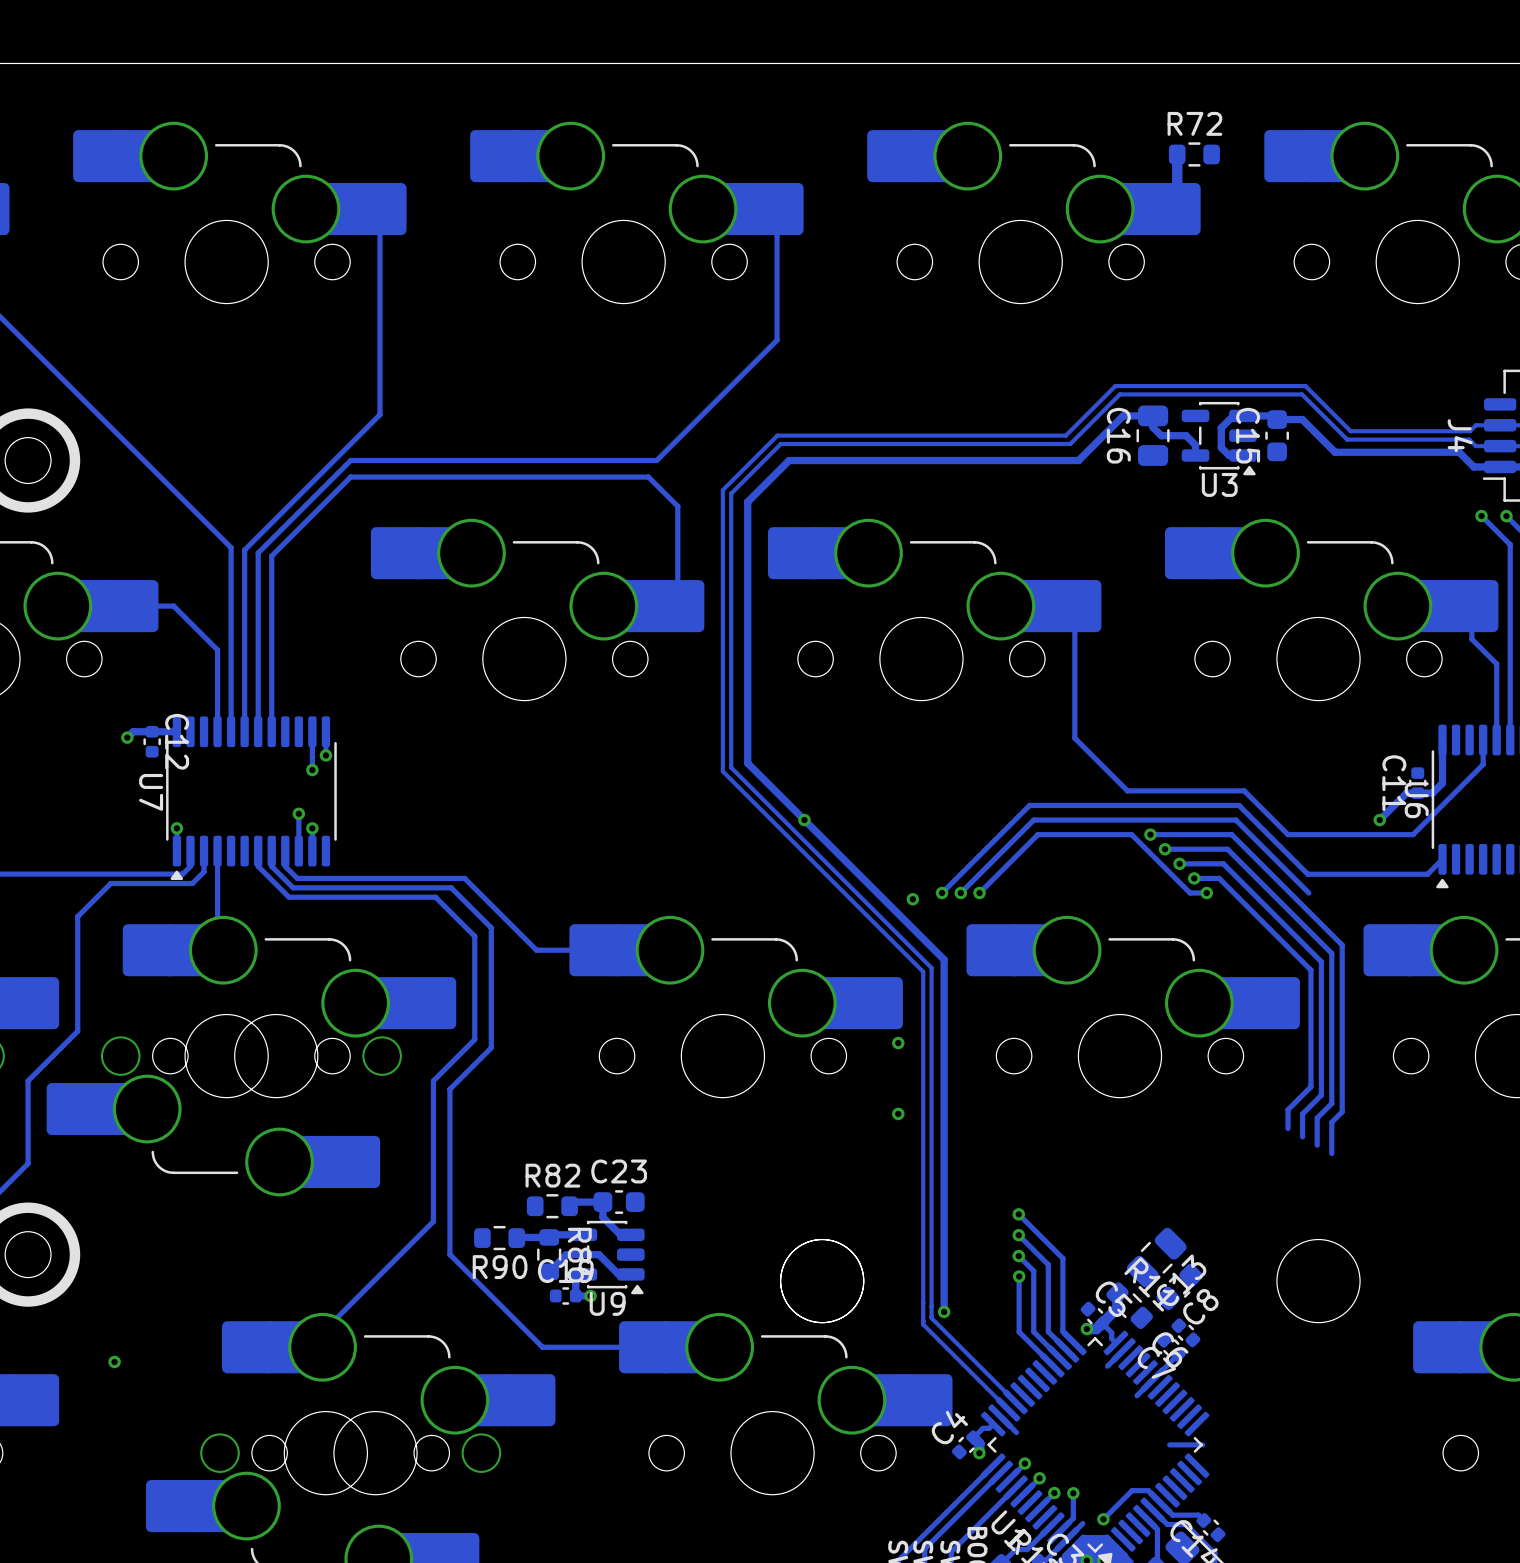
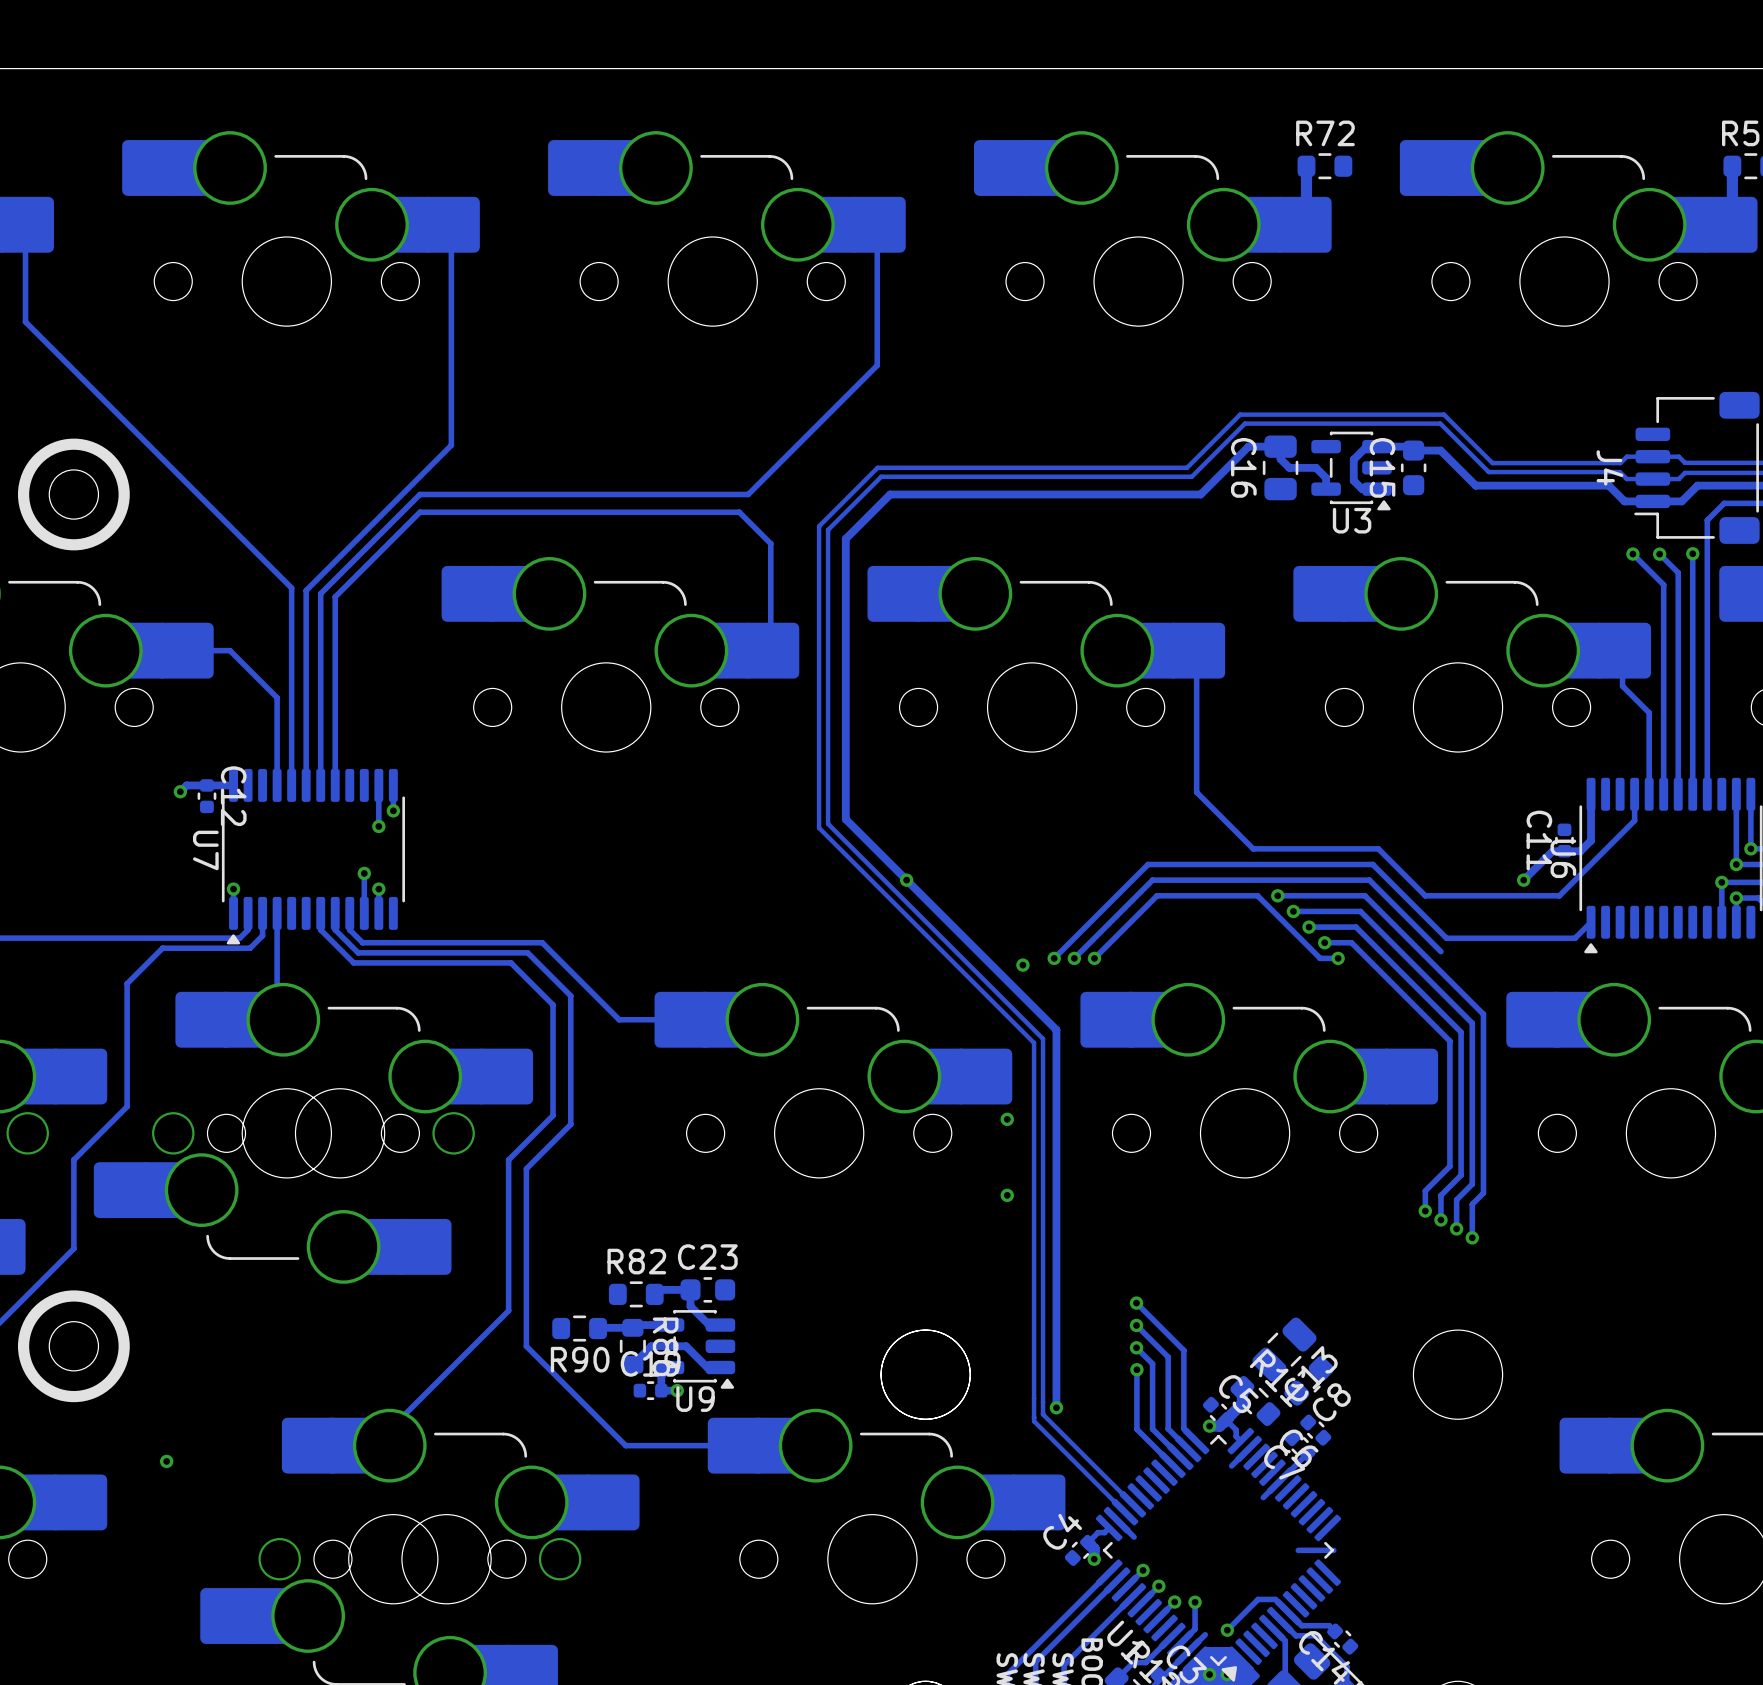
track: (1302, 886) (1308, 893) -> none
via: none -> (1425, 1211)
via: none -> (1440, 1219)
via: none -> (1456, 1228)
via: none -> (1472, 1237)

